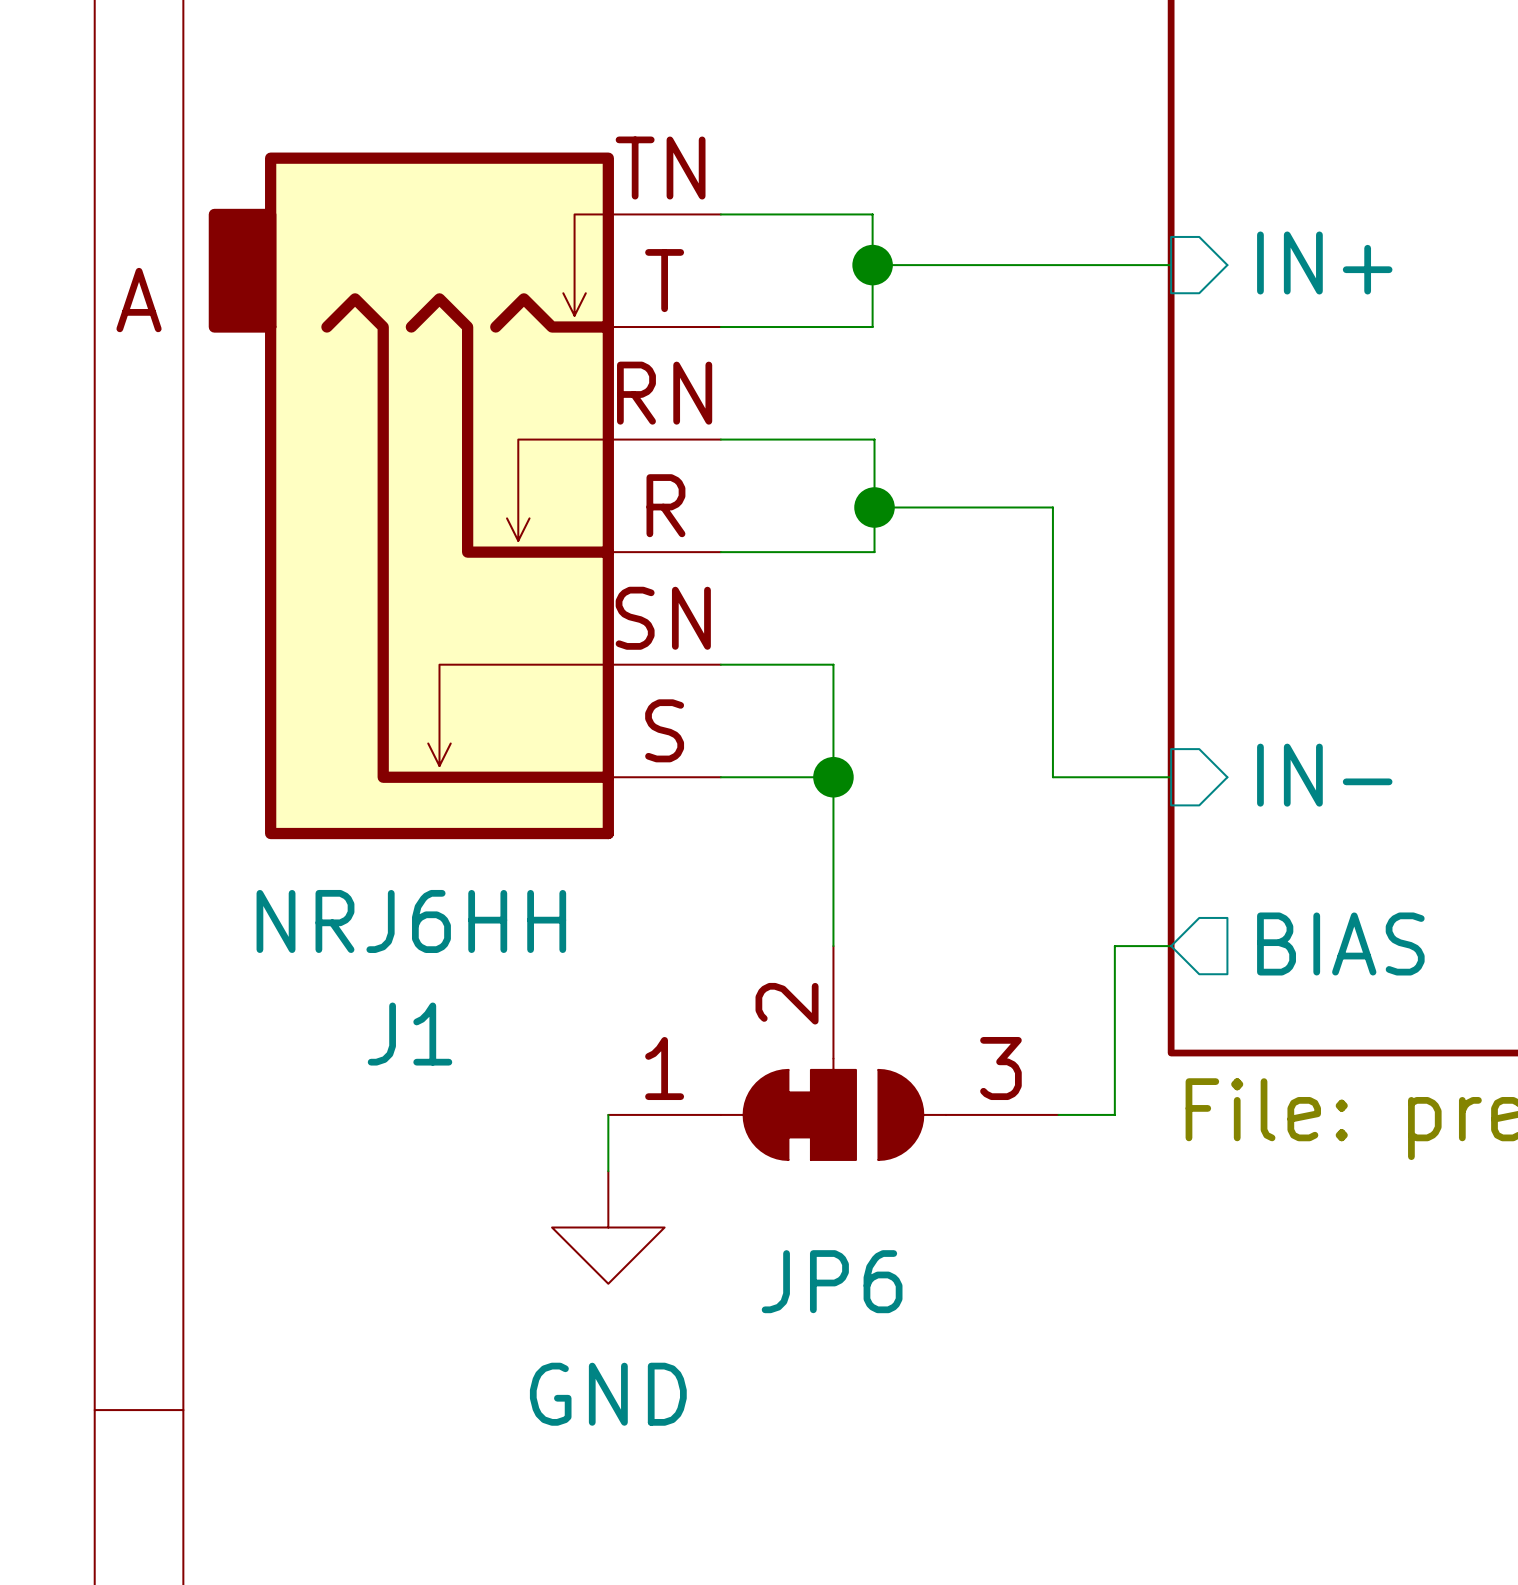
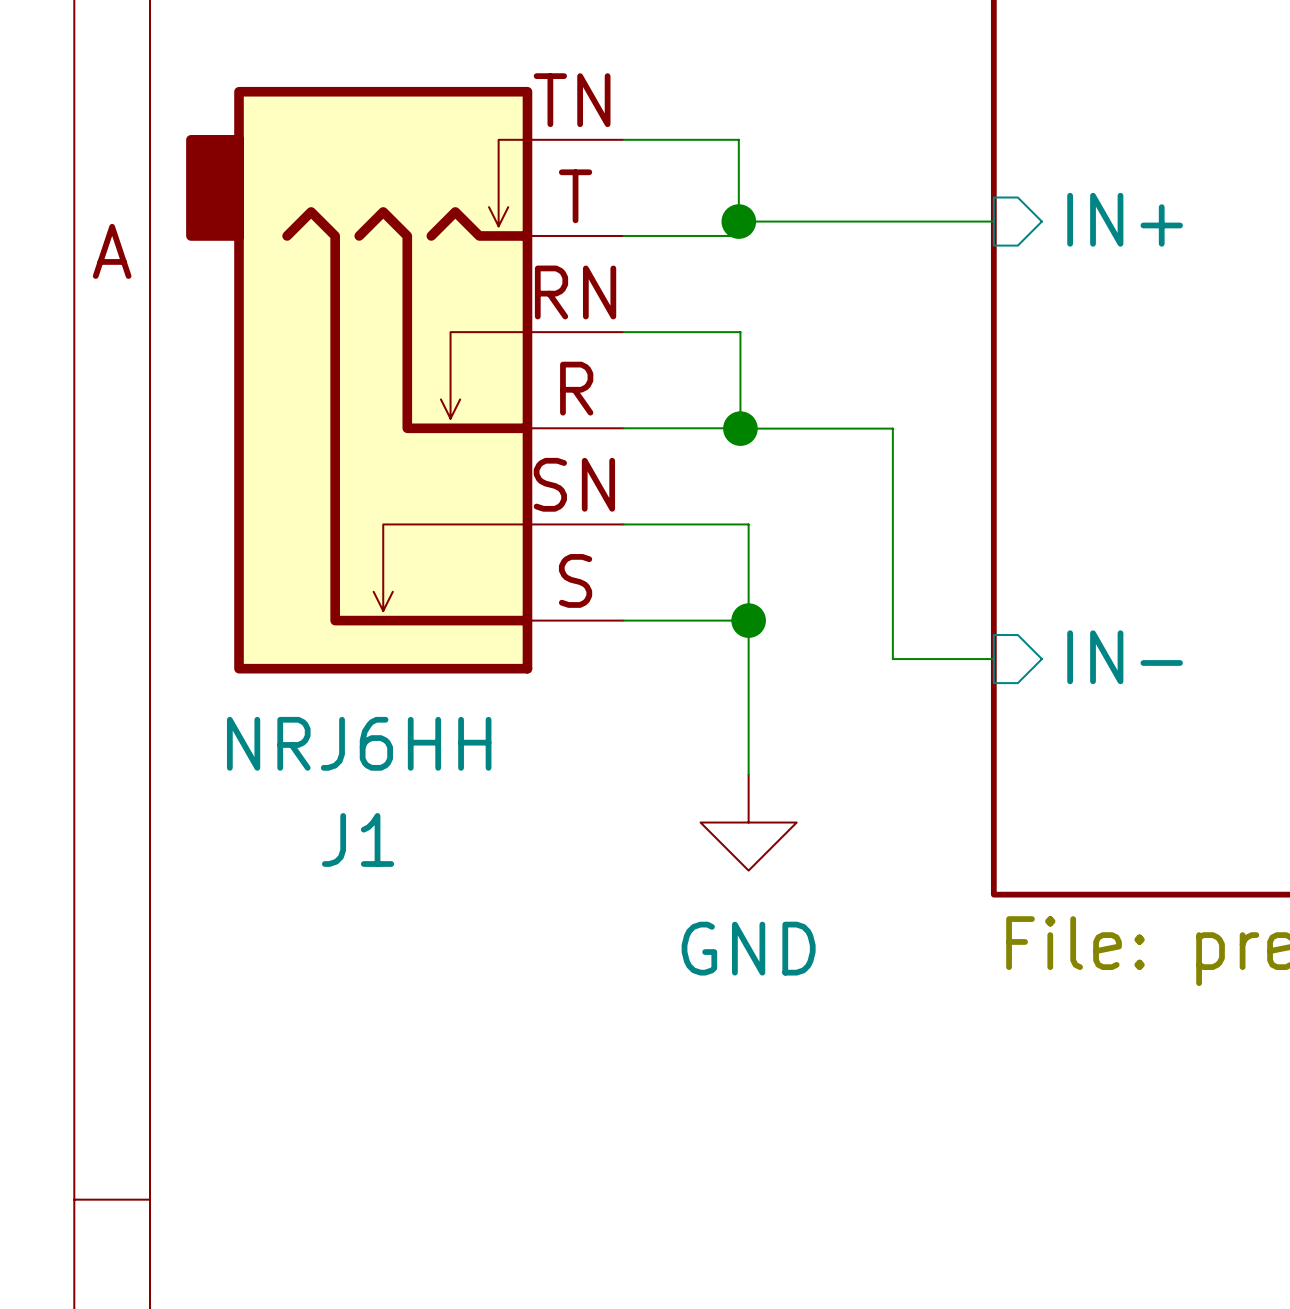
wire: (720, 214) (872, 214) -> (623, 139) (738, 139) (738, 178)
wire: (872, 281) (872, 327) (720, 327) -> (738, 235) (623, 235)
wire: (720, 439) (874, 439) -> (623, 332) (740, 332) (740, 370)
J1 position: (464, 495) -> (404, 380)
wire: (874, 507) (874, 552) (720, 552) -> (740, 428) (623, 428)
wire: none -> (623, 524) (748, 524) (748, 774)
wire: (720, 664) (833, 664) (833, 946) -> none
wire: none -> (623, 620) (748, 620)
wire: (720, 777) (833, 777) -> none
junction position: (833, 777) -> (748, 620)
sheet pin: BIAS (1340, 943) -> none
wire: (1171, 946) (1114, 946) (1114, 1114) (1058, 1114) -> none
JP6: (833, 1053) -> none
wire: (608, 1114) (608, 1171) -> none
power symbol position: GND (608, 1227) -> GND (748, 822)
power symbol text position: GND (608, 1394) -> GND (748, 948)

